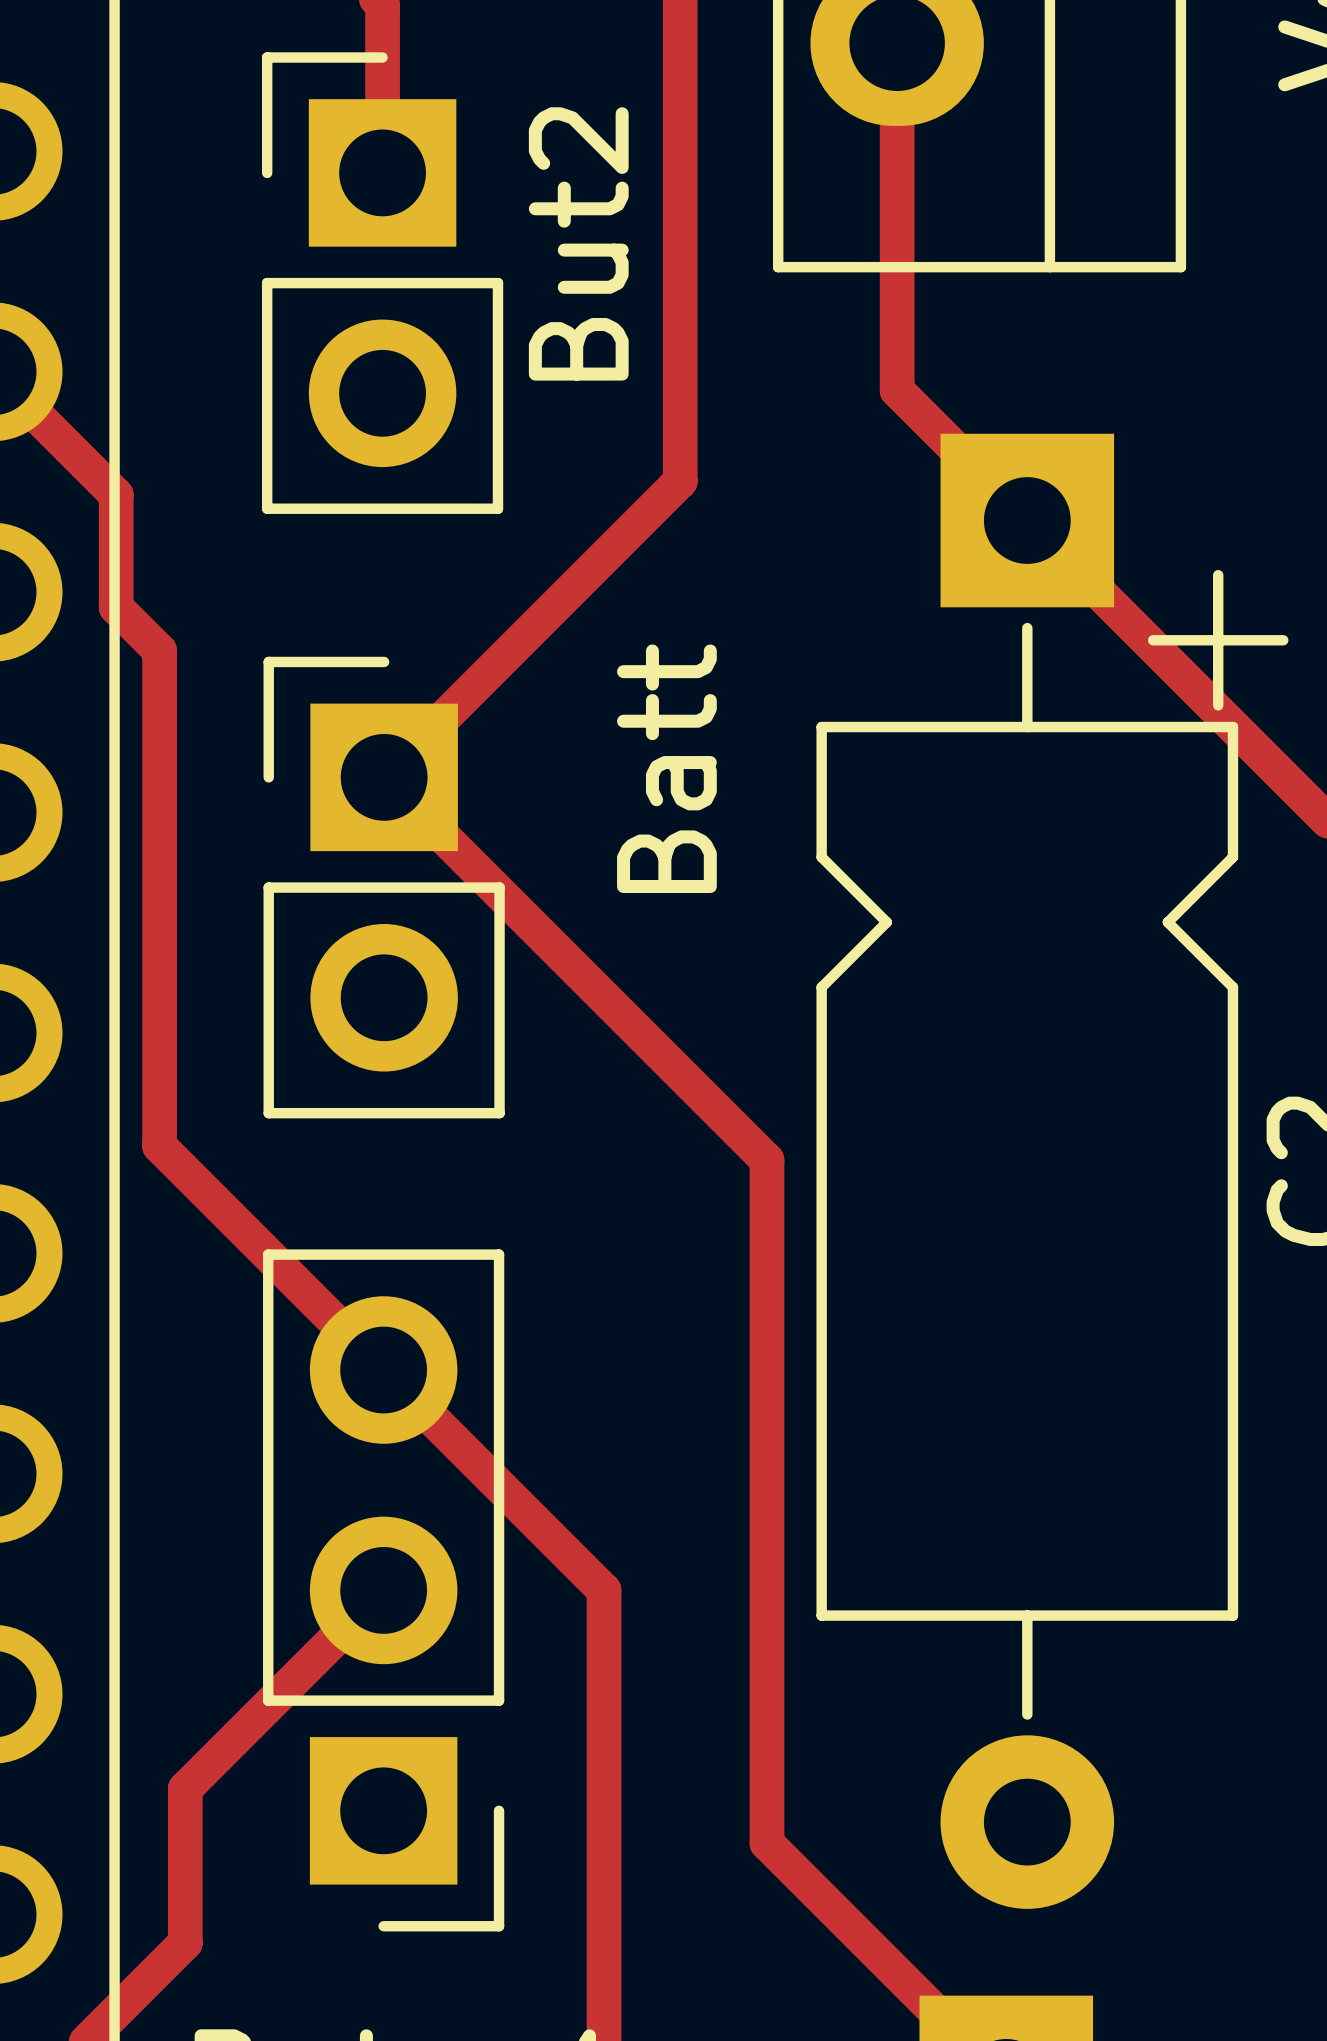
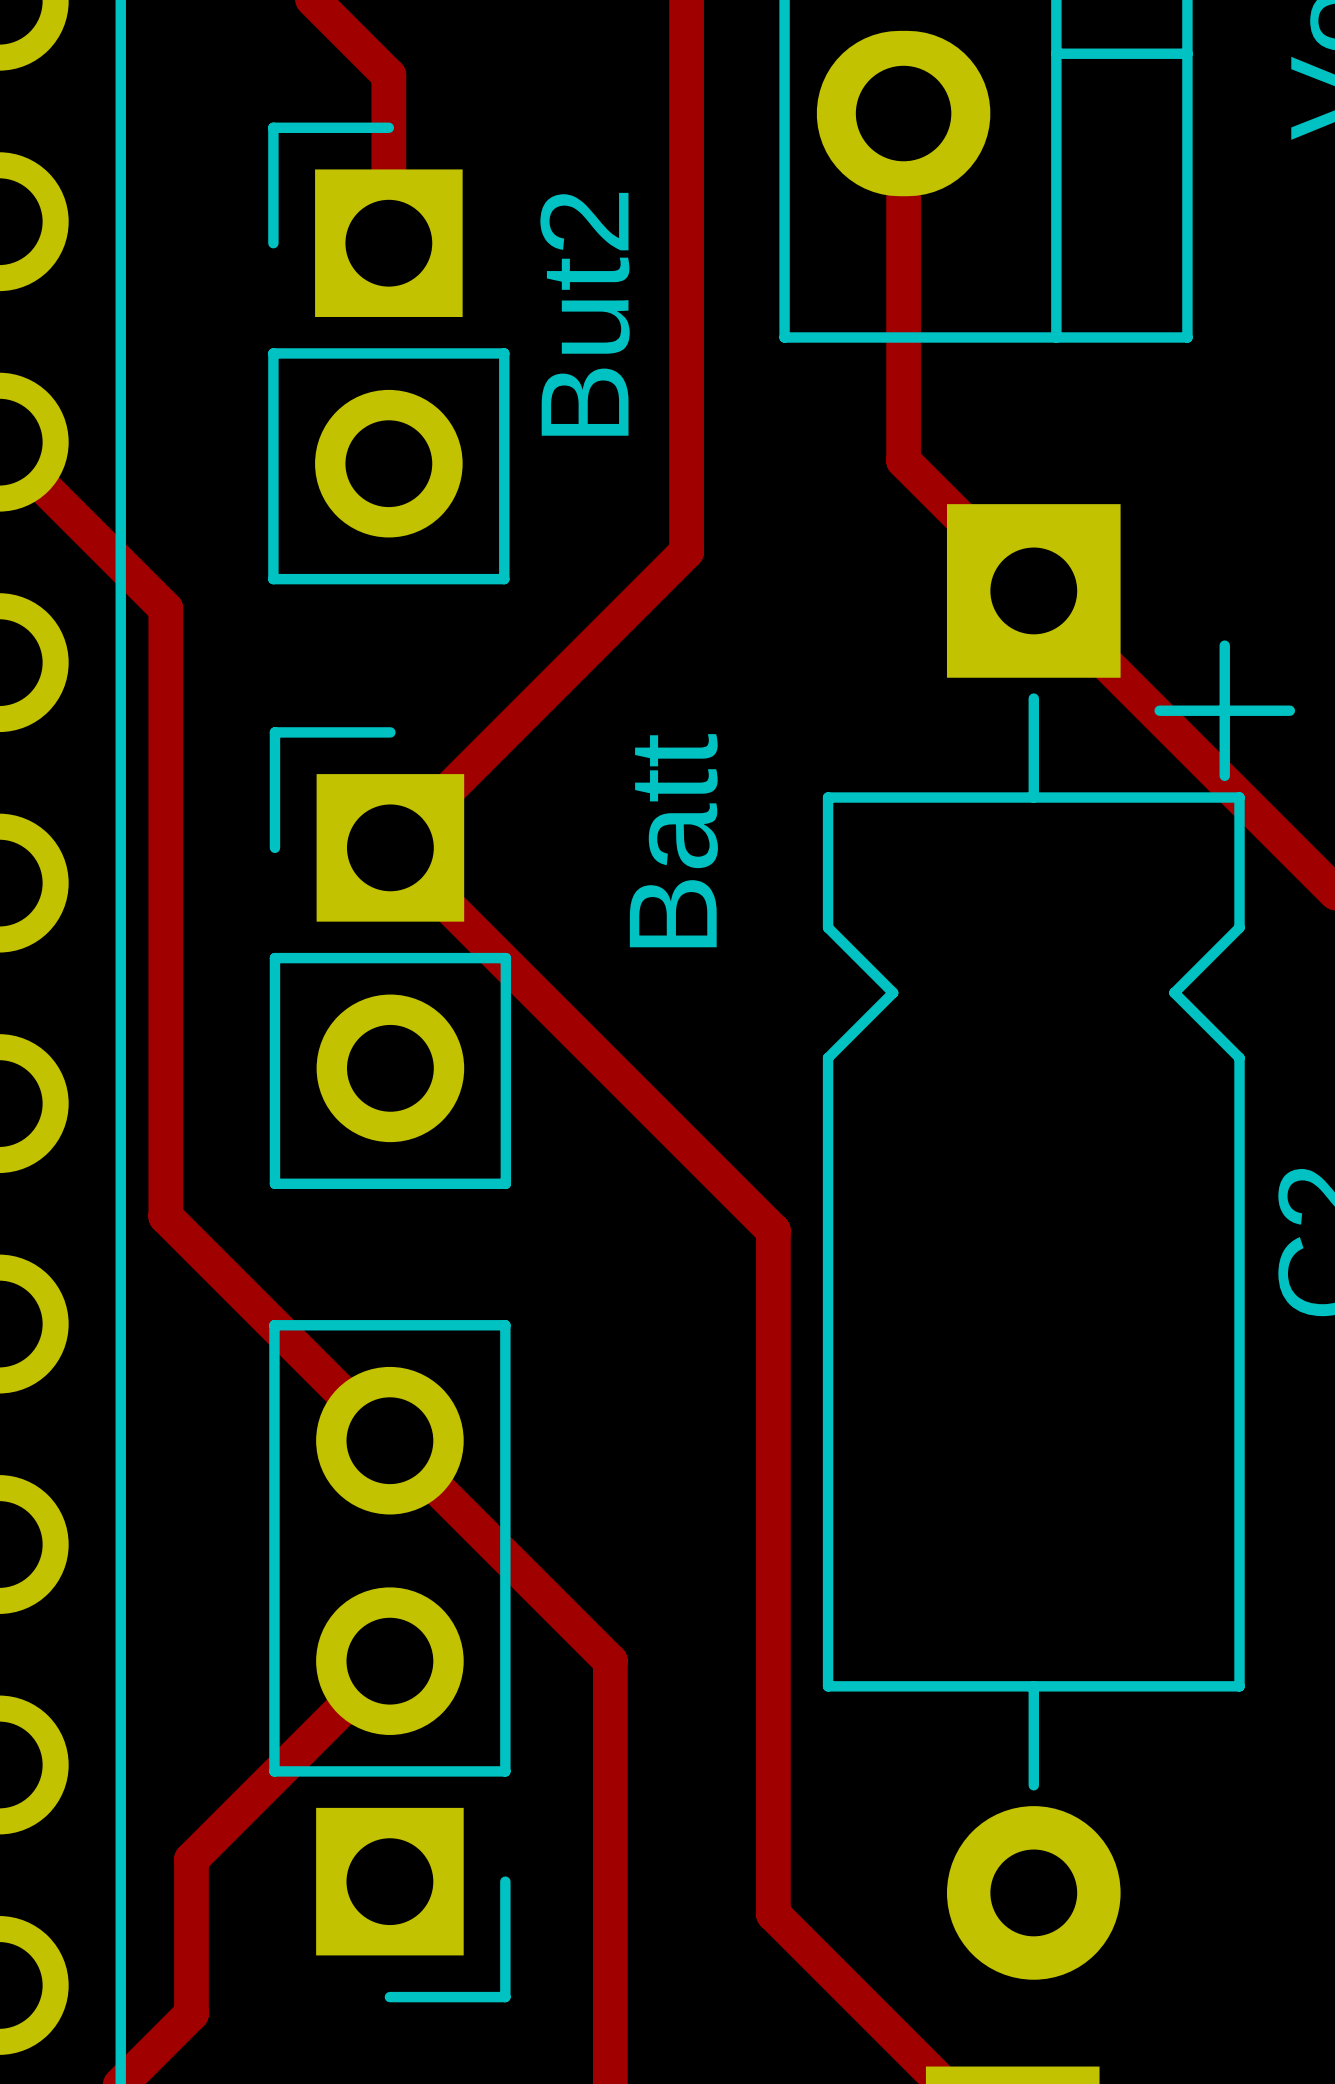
track: (116, 494) (116, 607) (159, 650) -> (122, 565) (165, 608) (165, 721)

